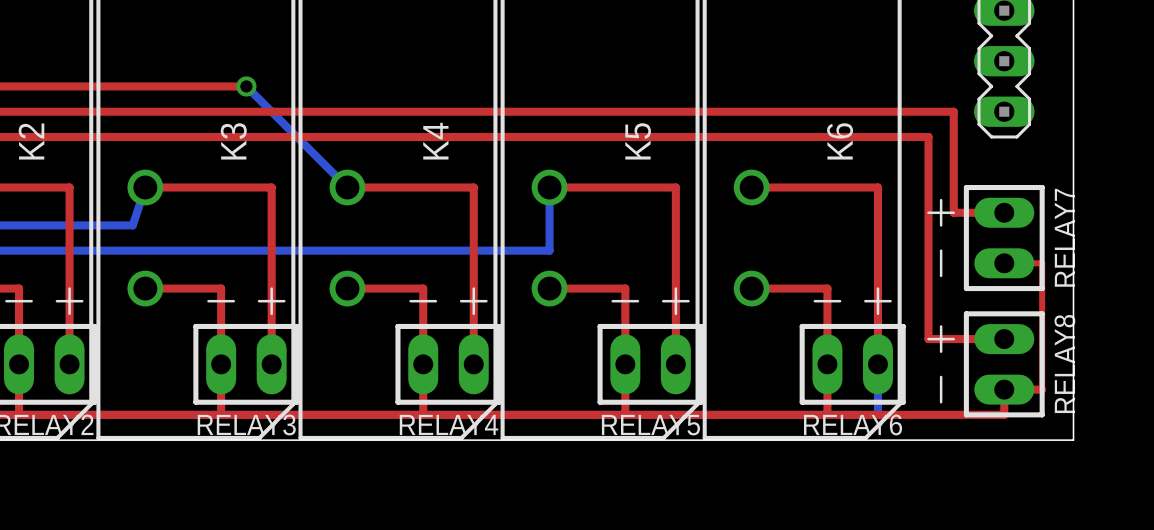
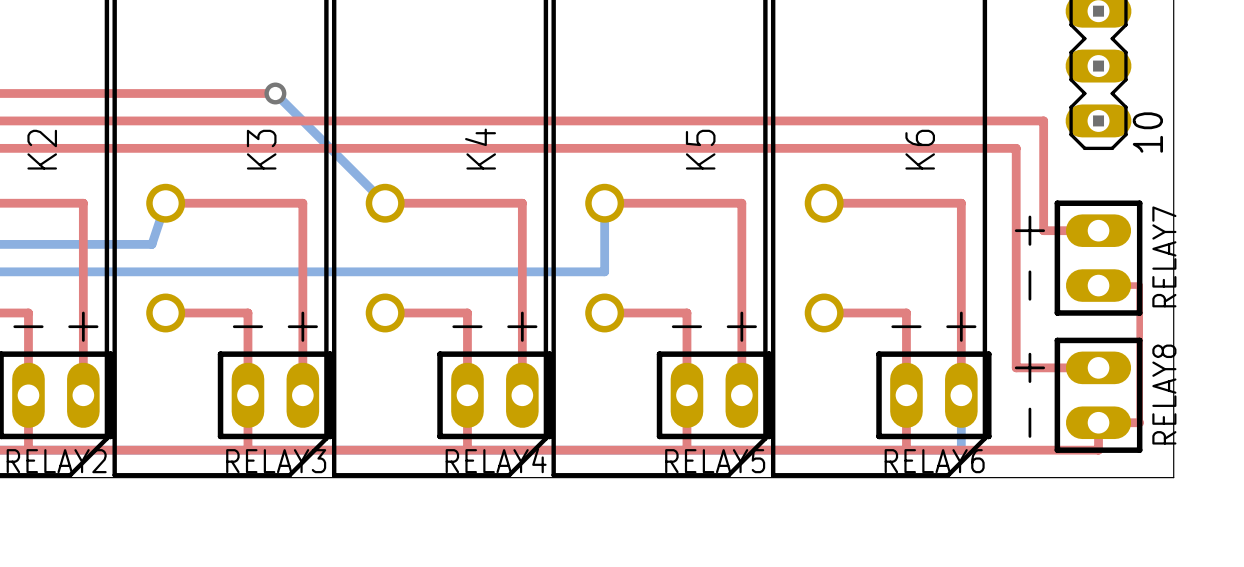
part text: none -> 10 (1147, 132)

